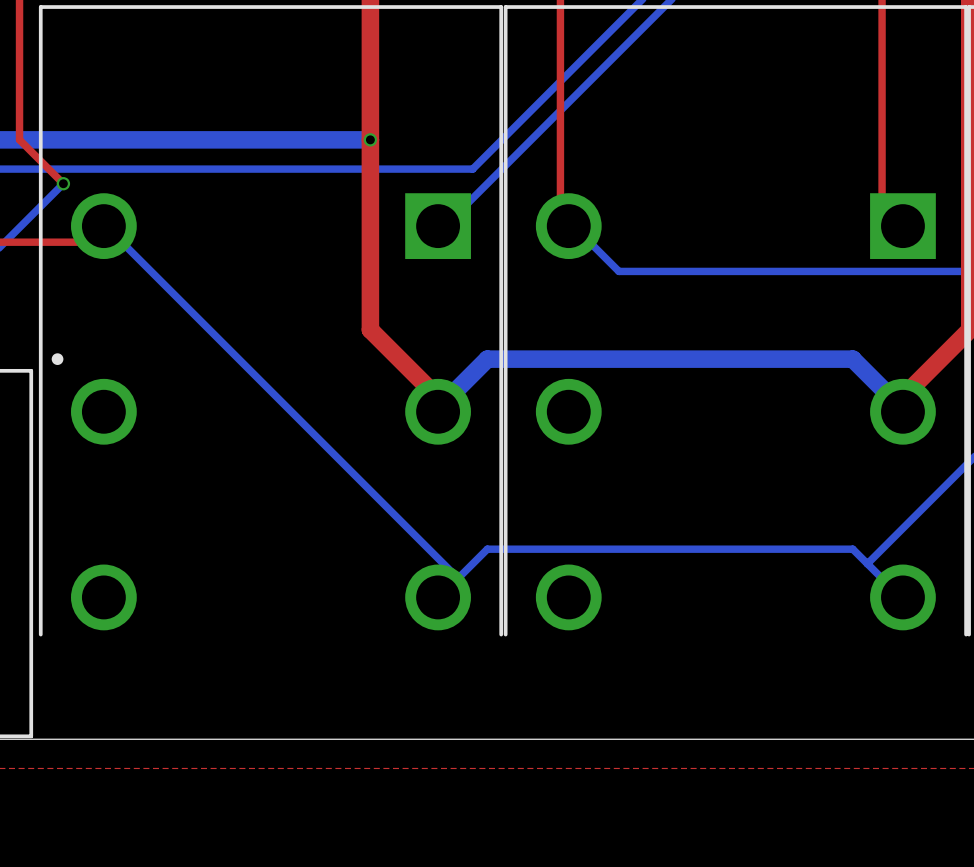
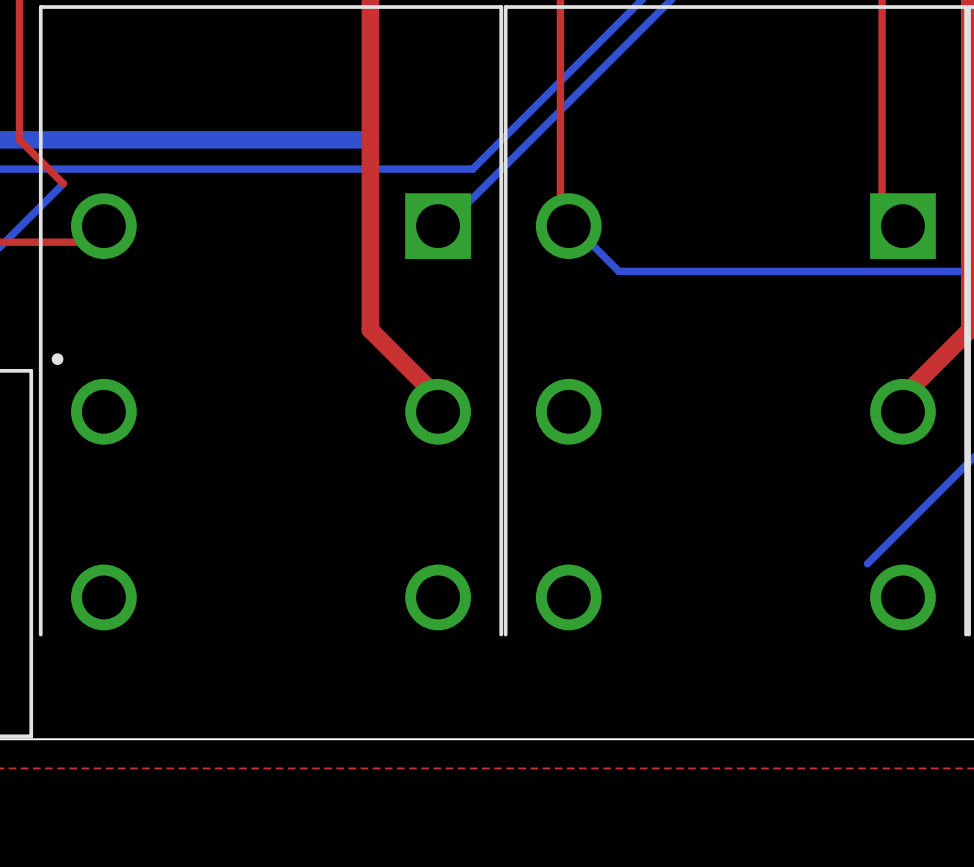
via: (370, 139) -> none
via: (63, 183) -> none
bottom track: (103, 226) (107, 227) (458, 578) (438, 597) (443, 593) (487, 549) (852, 549) (902, 597) -> none
bottom track: (438, 411) (443, 403) (487, 359) (852, 359) (902, 411) -> none

